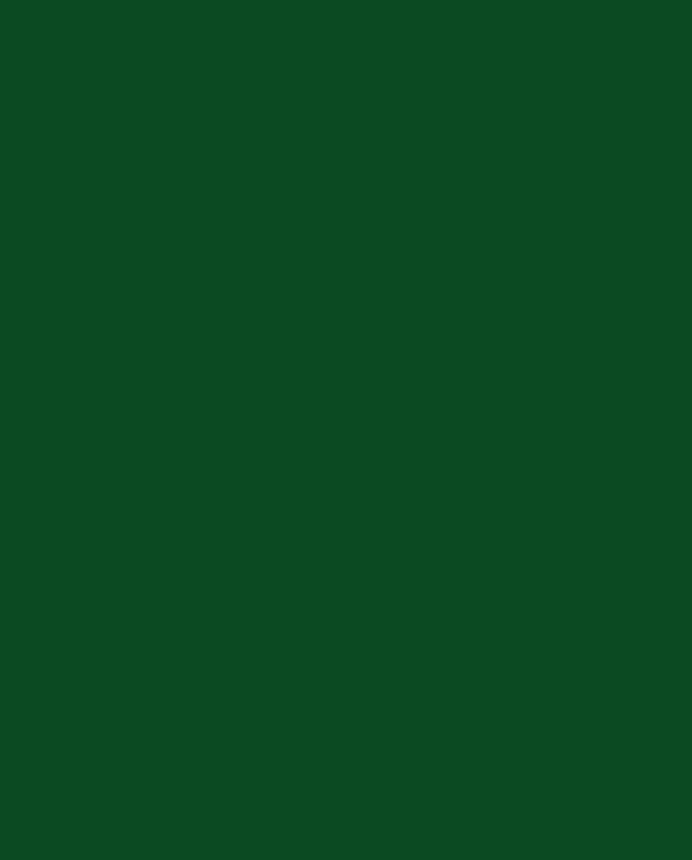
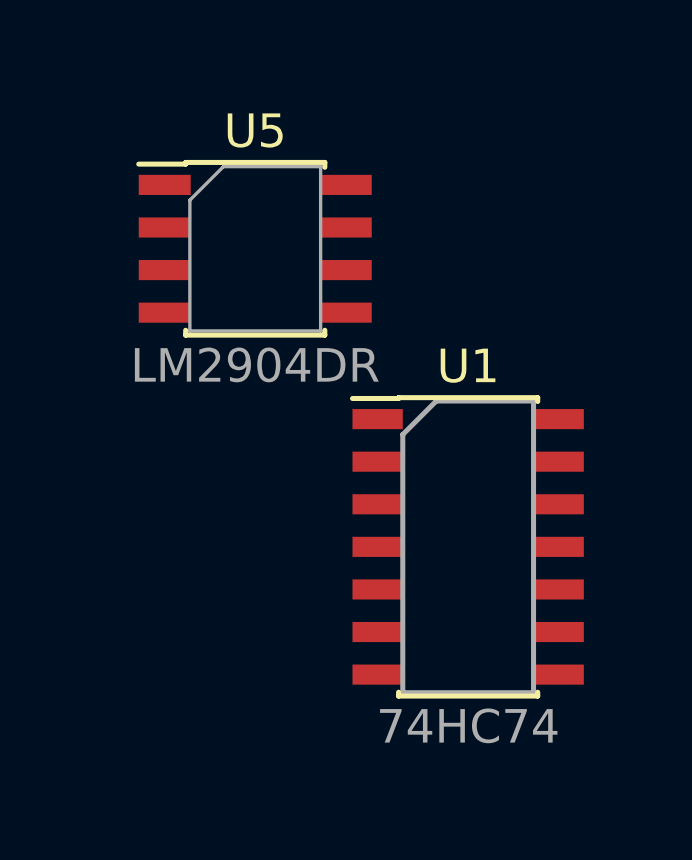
U5: none -> LM2904DR (253, 248)
U1: none -> 74HC74 (466, 546)

